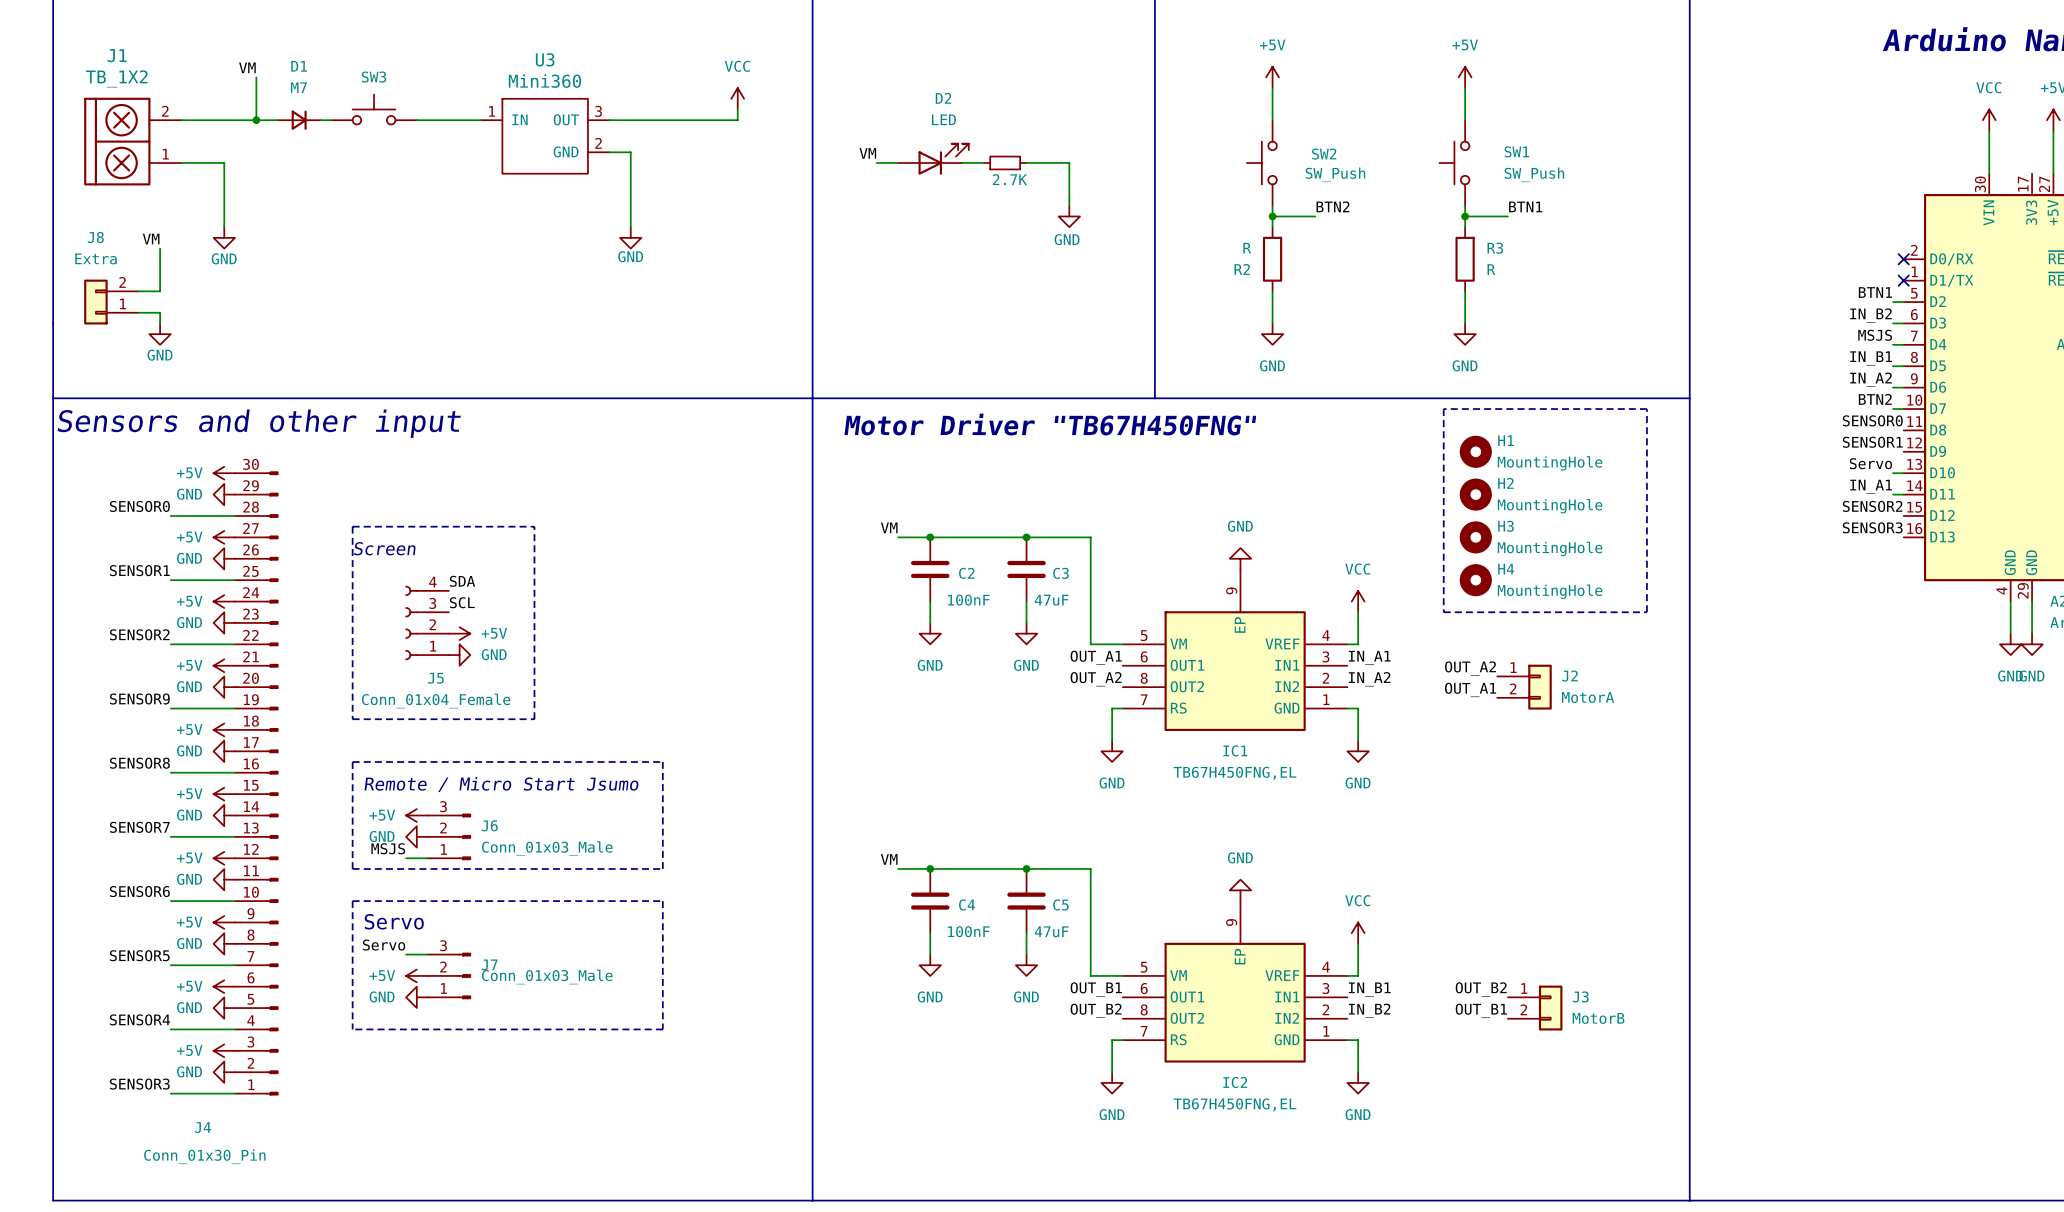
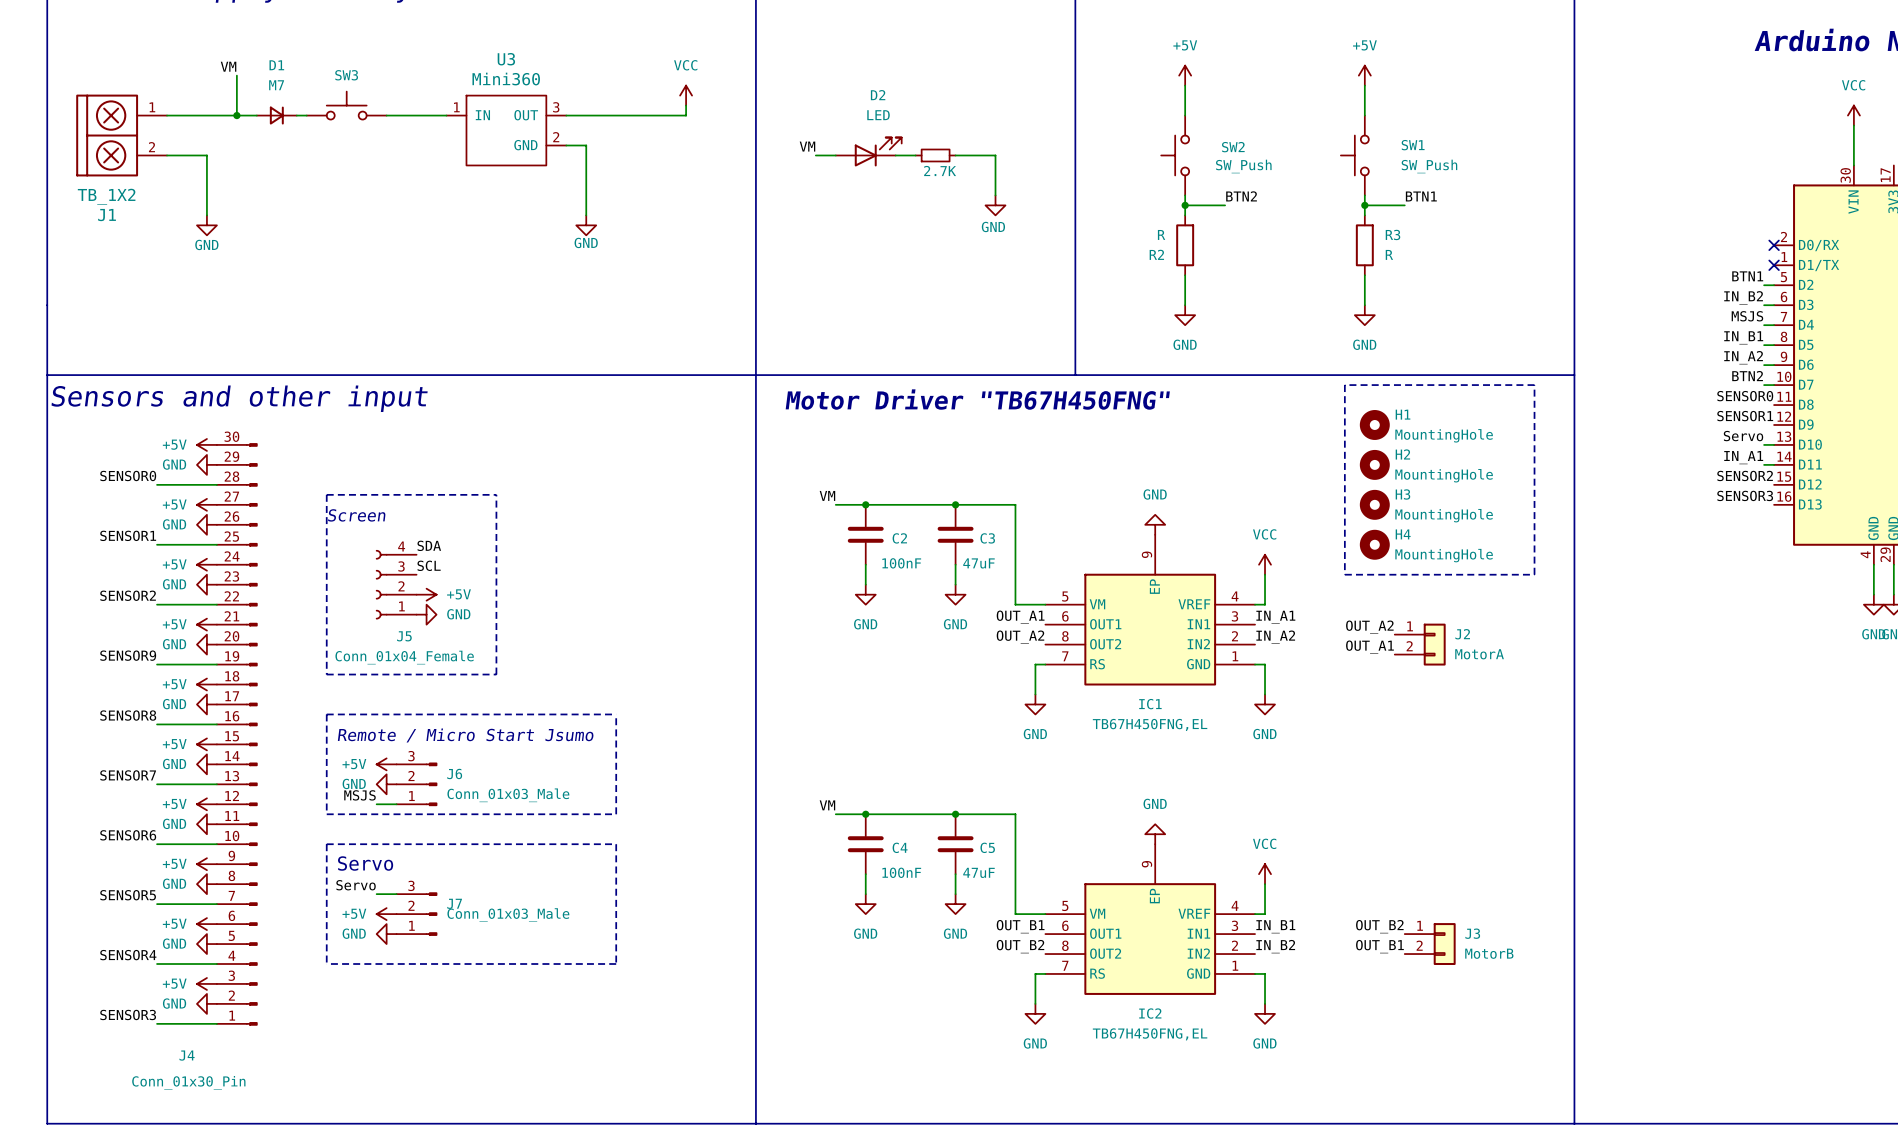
J1 flip: as is (117, 141) -> up-down (107, 135)
label: VM (151, 239) -> none
wire: (160, 248) (160, 291) (138, 291) -> none
J8: Extra (111, 302) -> none
wire: (138, 312) (160, 312) (160, 323) -> none
power symbol: GND (160, 334) -> none

